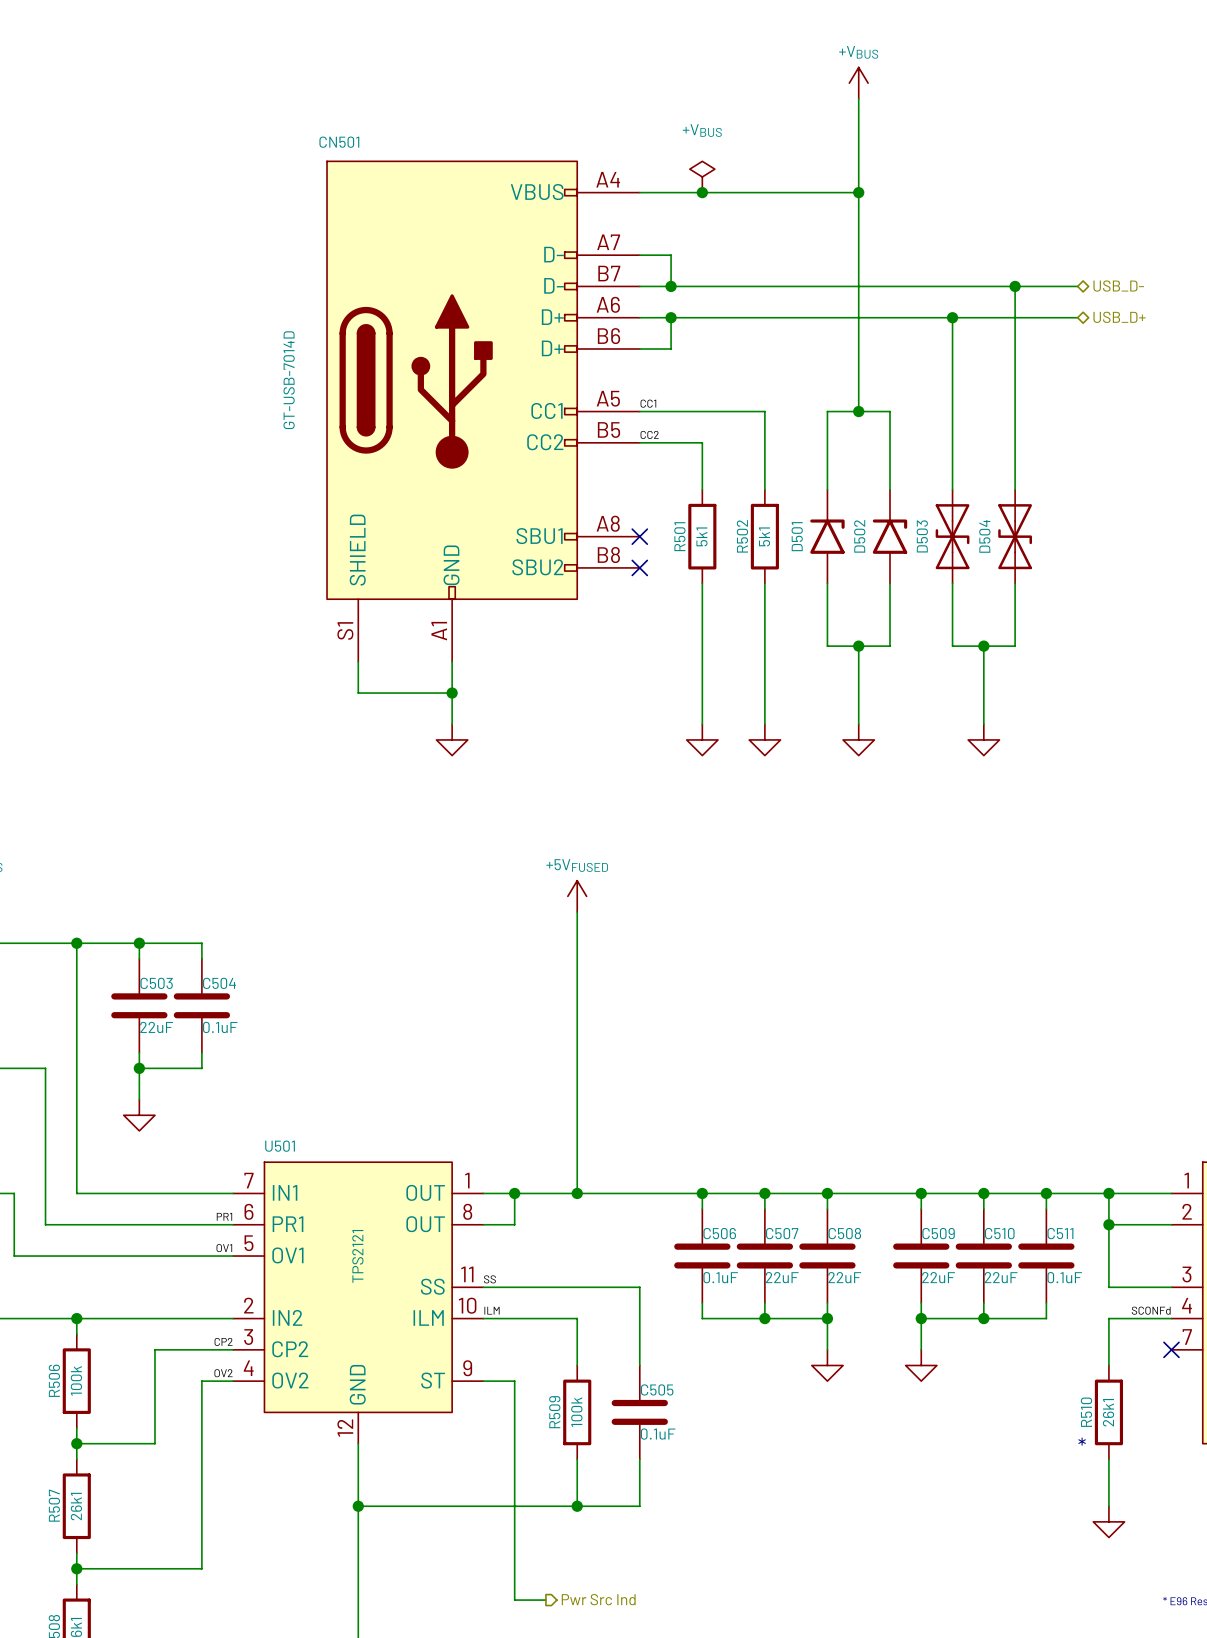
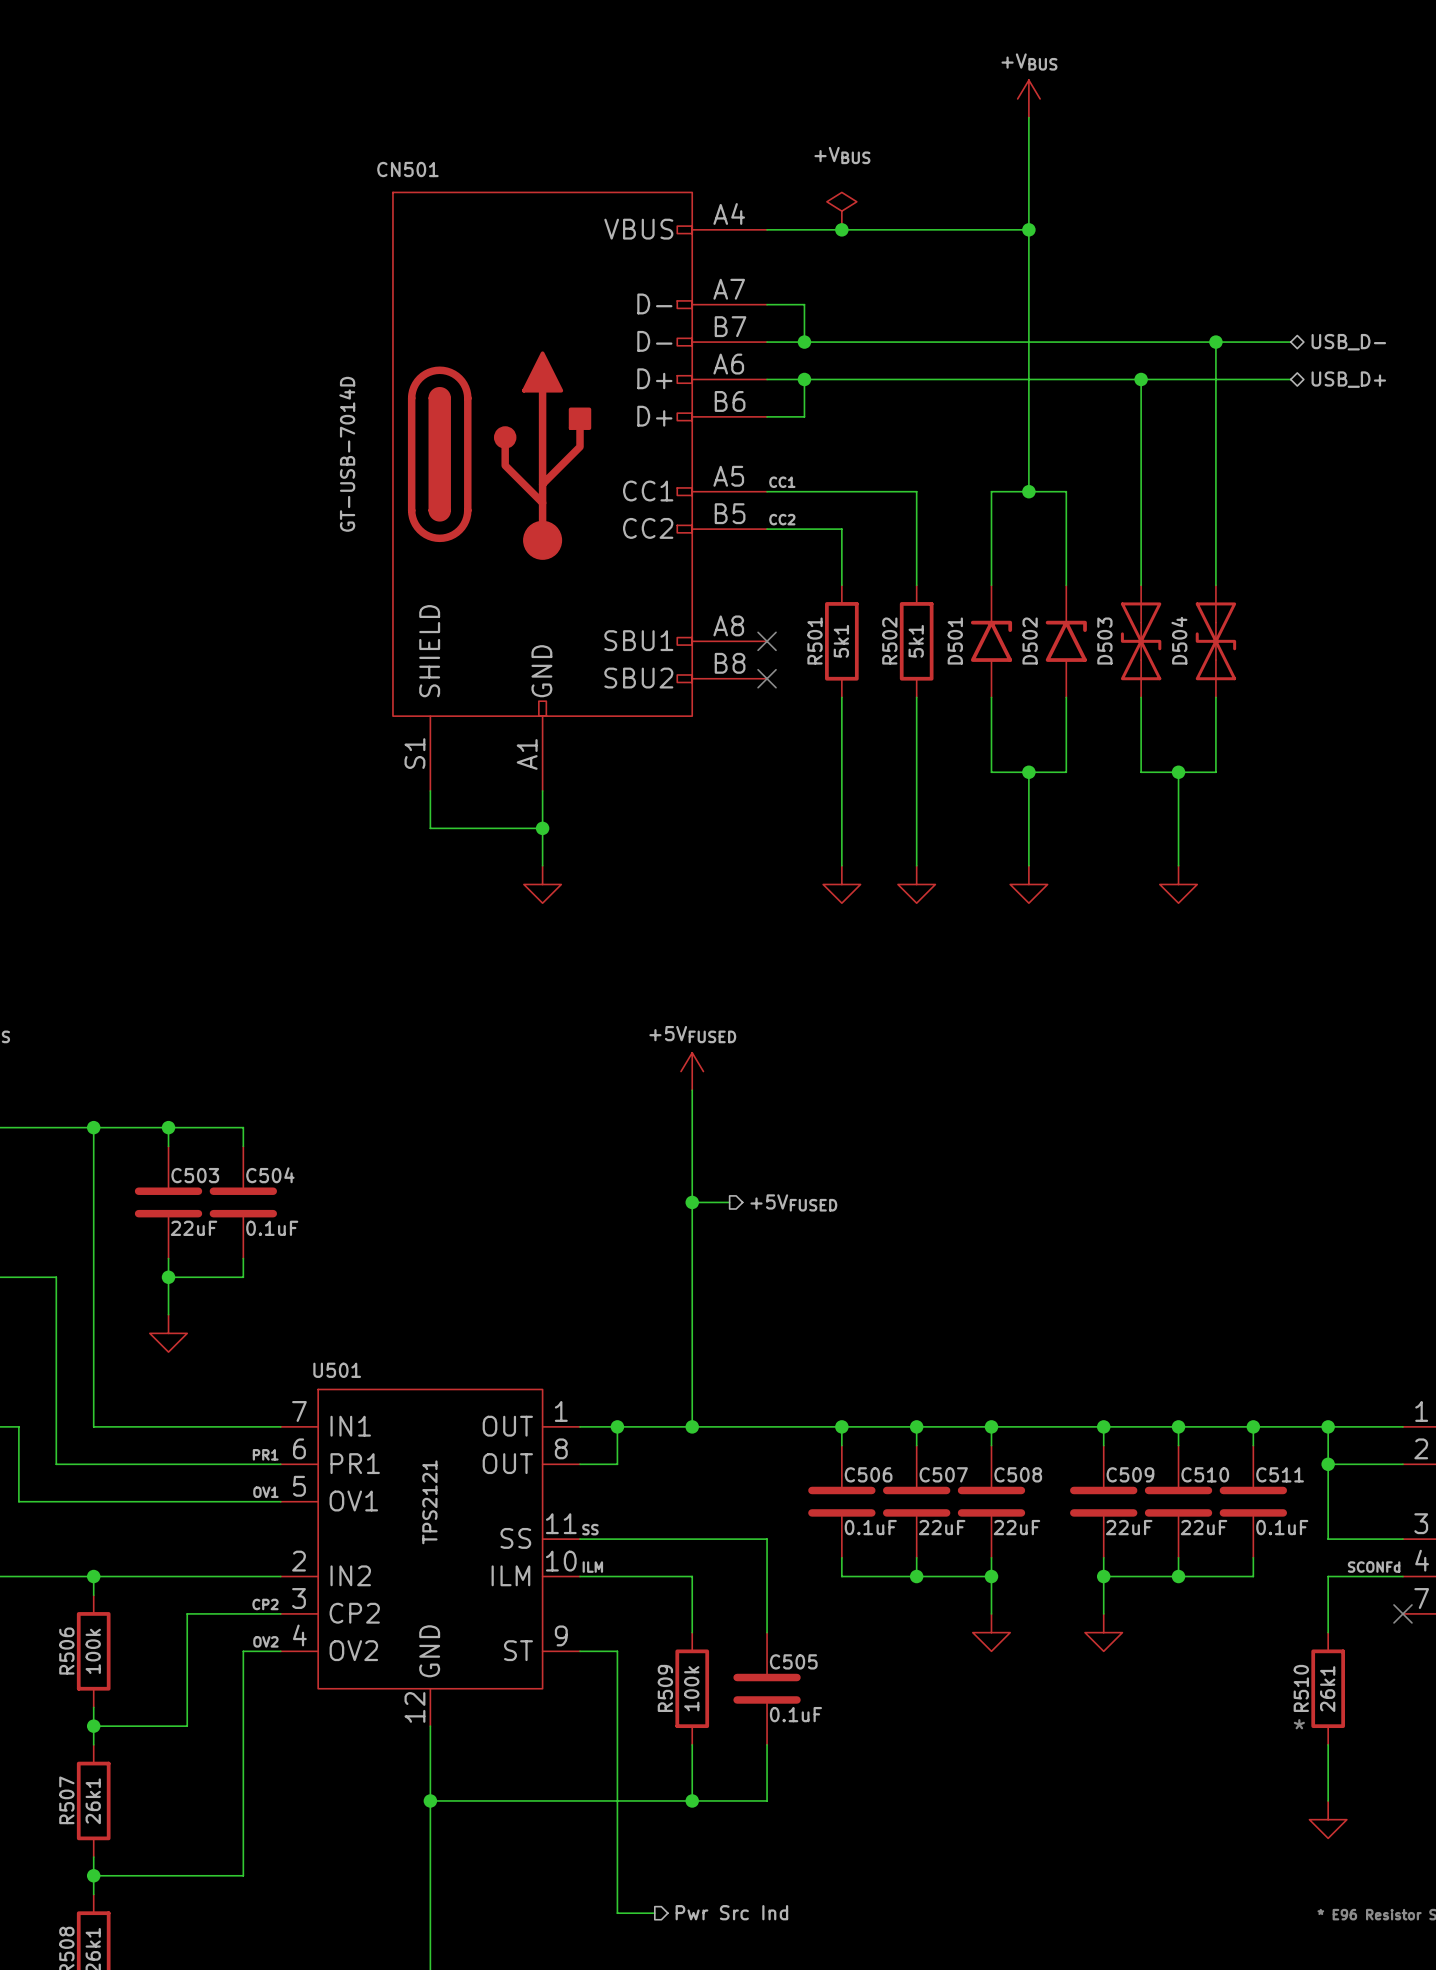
wire: none -> (692, 1202) (729, 1202)
junction: none -> (692, 1202)
hierarchical label: none -> +5VFUSED (793, 1202)

